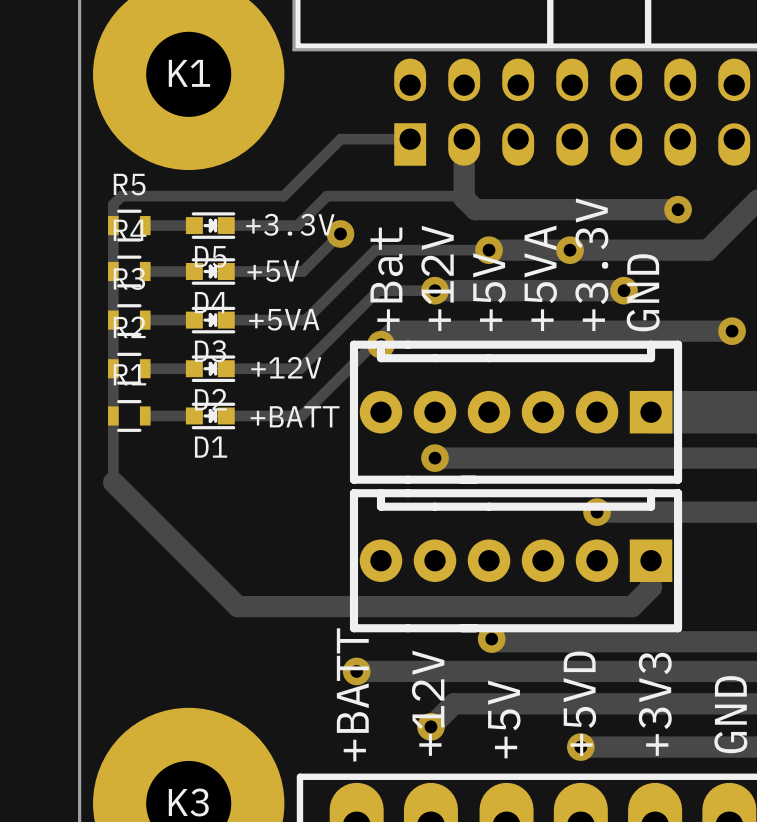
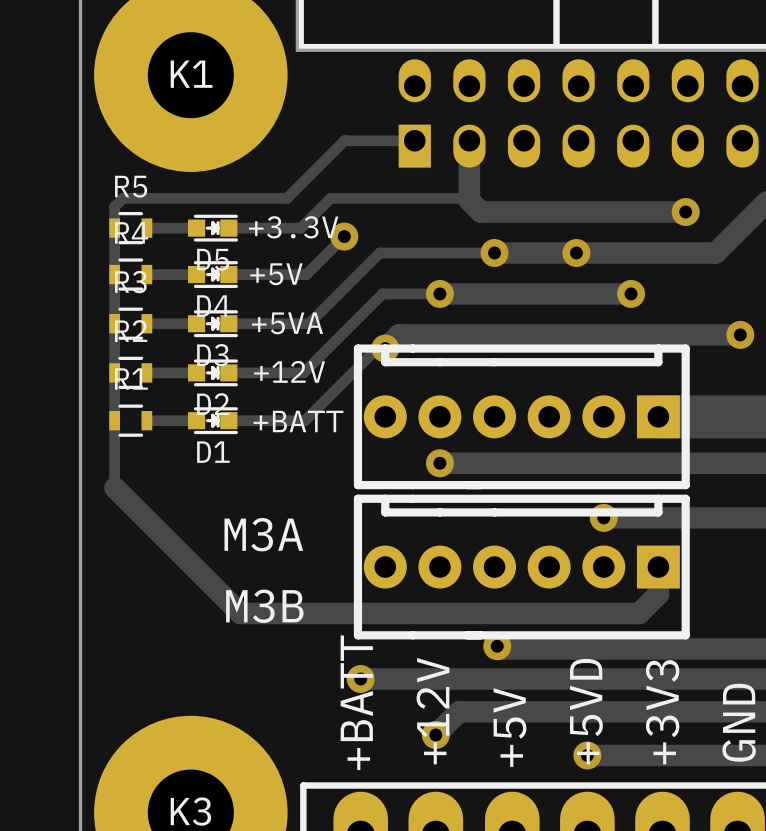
text: +3.3V (591, 264) -> none
text: +12V (437, 278) -> none
text: +5VA (540, 278) -> none
text: +Bat (386, 279) -> none
text: +5V (489, 292) -> none
text: GND (643, 292) -> none
text: none -> M3A (263, 534)
text: none -> M3B (264, 606)

